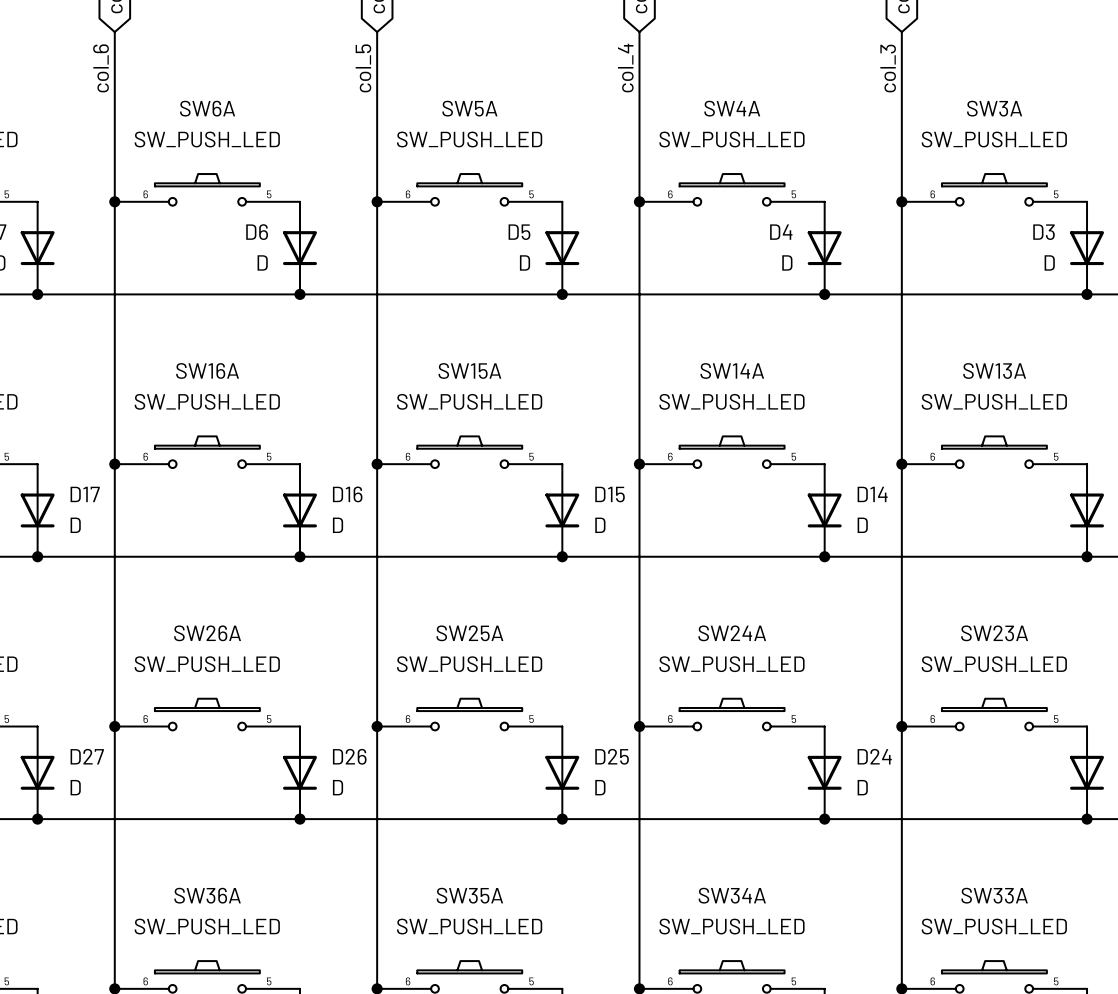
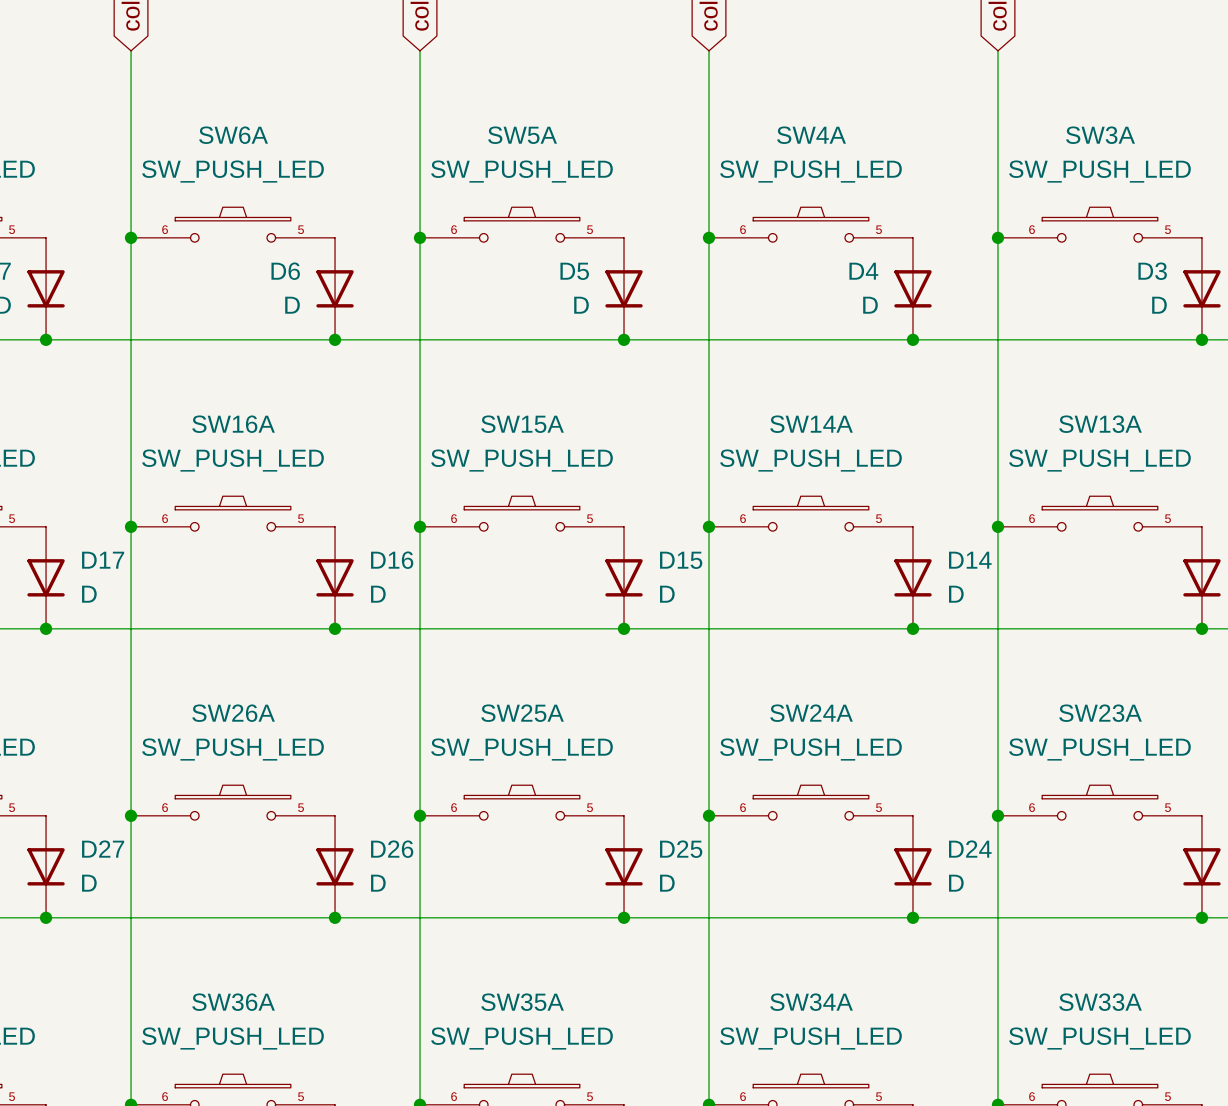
label: col_6 (101, 68) -> none
label: col_5 (363, 68) -> none
label: col_4 (625, 68) -> none
label: col_3 (888, 68) -> none

